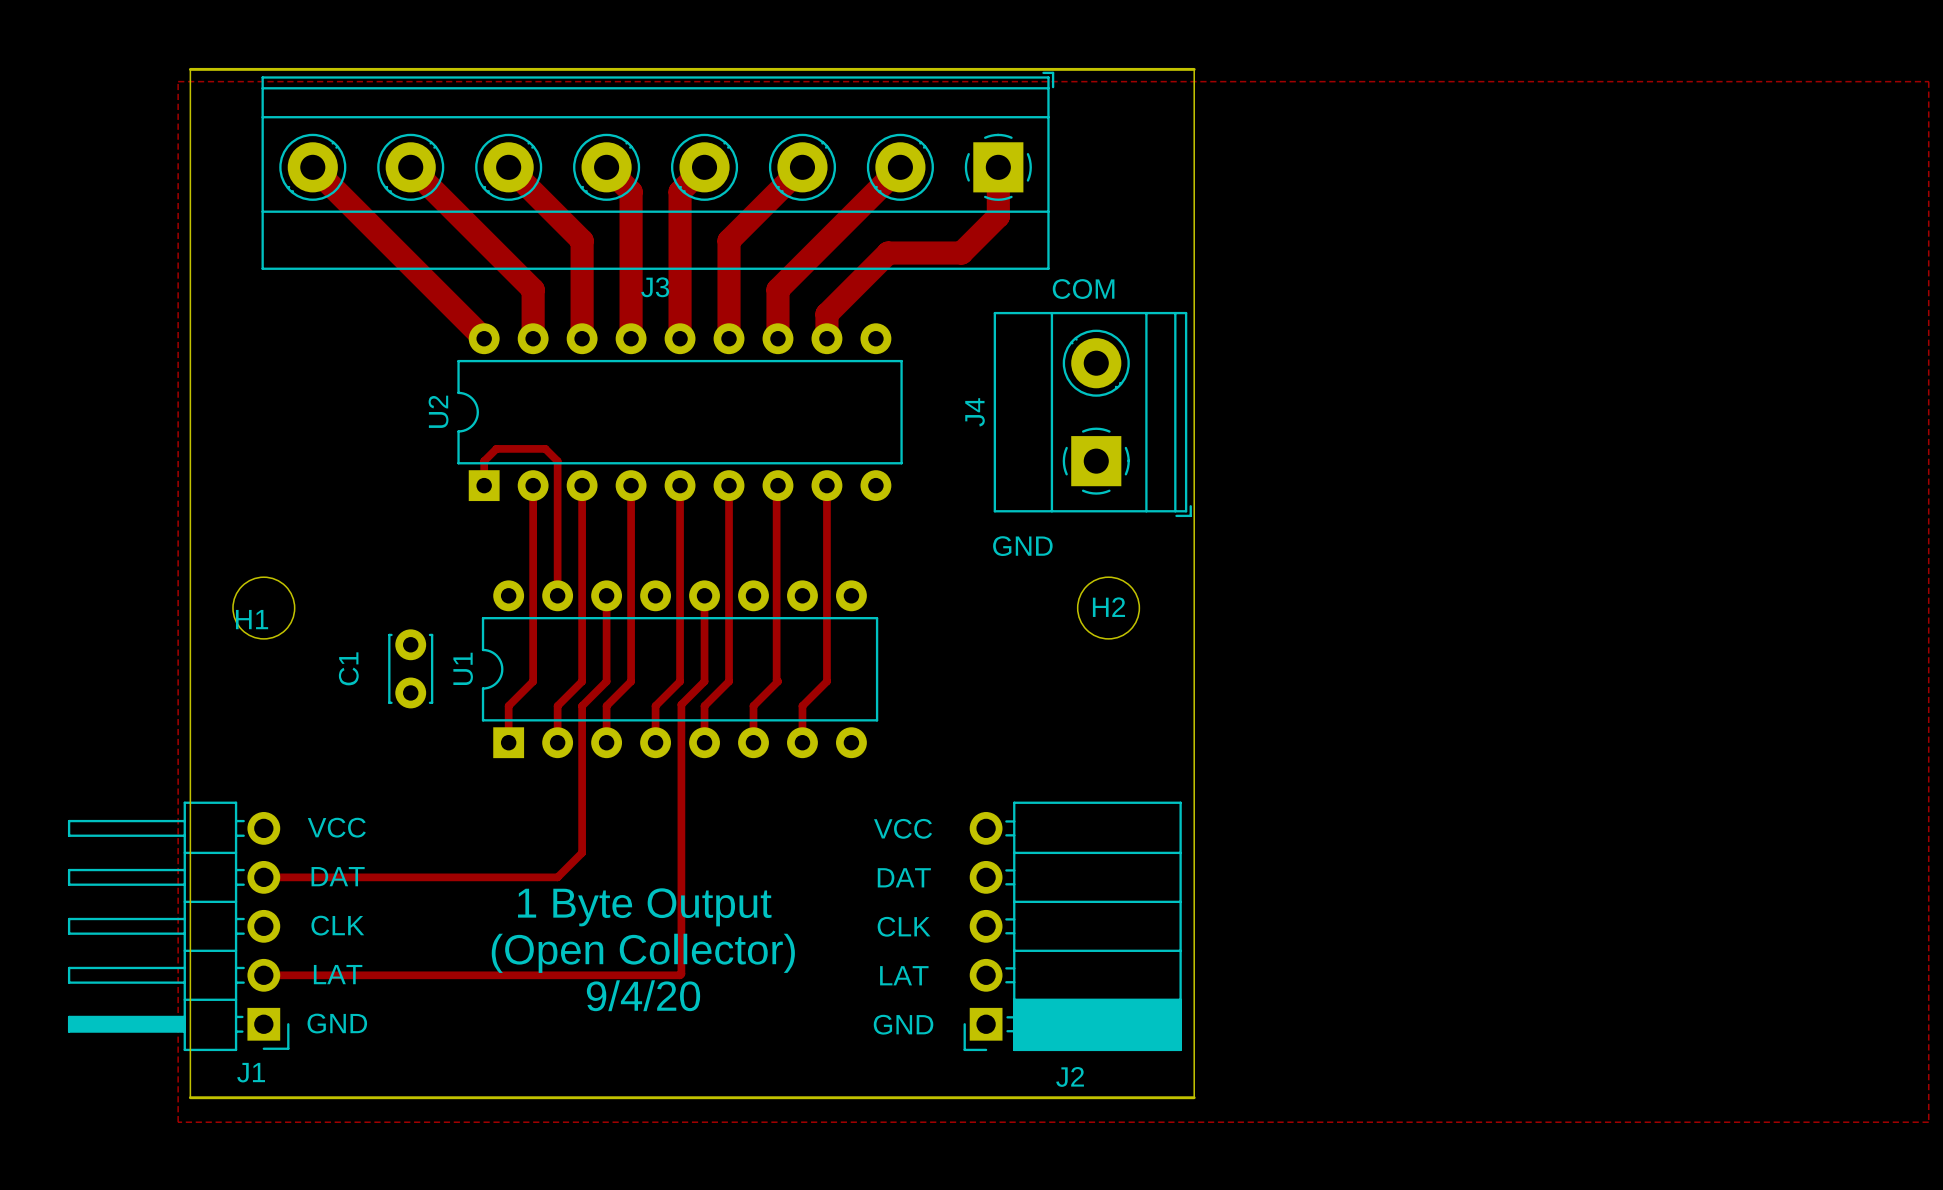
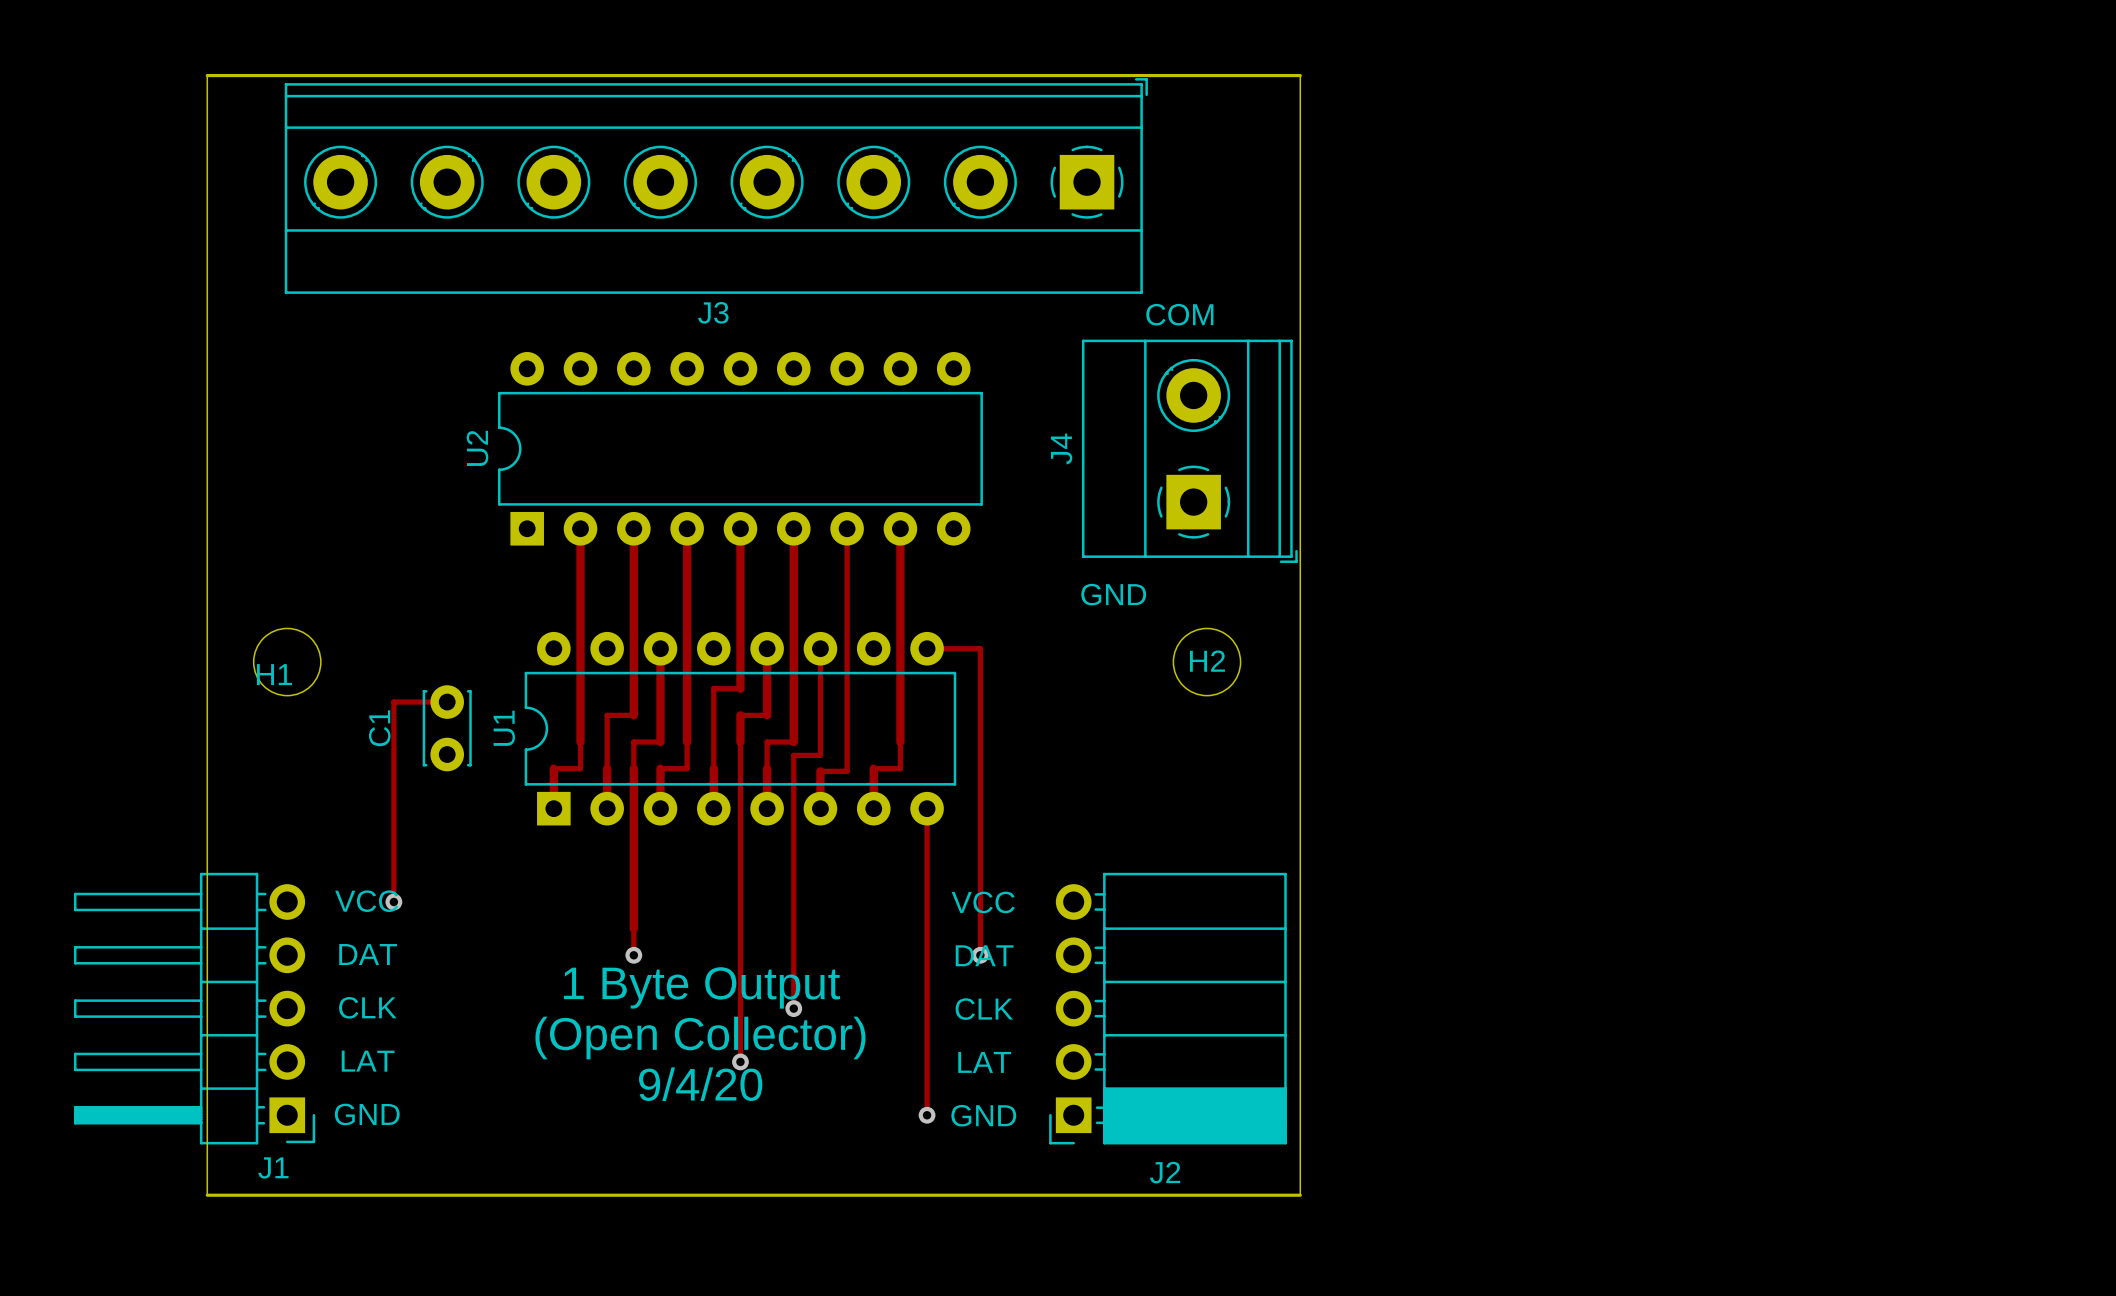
zone outline: (178, 81) (1928, 81) (1928, 1122) (178, 1122) (178, 81) -> none
track: (312, 167) (484, 338) -> none
track: (410, 167) (533, 289) (533, 338) -> none
track: (508, 167) (582, 240) (582, 338) -> none
track: (606, 167) (631, 191) (631, 338) -> none
track: (704, 167) (680, 191) (680, 338) -> none
track: (802, 167) (729, 240) (729, 338) -> none
track: (900, 167) (777, 289) (777, 338) -> none
track: (998, 167) (998, 216) (961, 253) (888, 253) (826, 314) (826, 338) -> none
track: (484, 485) (484, 461) (496, 448) (545, 448) (557, 461) (557, 595) -> none
track: (777, 485) (777, 681) (753, 705) (753, 708) -> (847, 528) (847, 771) (820, 771)
track: none -> (820, 648) (820, 755) (793, 755) (793, 1008)
track: none -> (927, 648) (980, 648) (980, 955)
track: (680, 632) (680, 657) -> (767, 715) (740, 715)
track: none -> (447, 702) (393, 702) (393, 901)
track: (582, 657) (582, 681) (557, 705) -> (633, 715) (607, 715) (607, 768)
track: (704, 657) (704, 681) (681, 704) (680, 975) (263, 975) -> none
track: (533, 681) (508, 705) -> (580, 742) (580, 768) (553, 768)
track: (606, 681) (582, 705) -> (660, 742) (633, 742) (633, 768)
track: (631, 681) (606, 705) -> (687, 742) (687, 768) (660, 768)
track: (680, 681) (655, 705) -> (740, 688) (713, 688) (713, 768)
track: none -> (740, 742) (740, 1061)
track: (729, 681) (704, 705) -> (793, 742) (767, 742) (767, 768)
track: (826, 681) (802, 705) -> (900, 742) (900, 768) (873, 768)
track: none -> (927, 808) (927, 1115)
via: none -> (393, 901)
track: (582, 852) (557, 877) (263, 877) -> (633, 928) (633, 955)
via: none -> (633, 955)
via: none -> (980, 955)
via: none -> (793, 1008)
via: none -> (740, 1061)
via: none -> (927, 1115)

